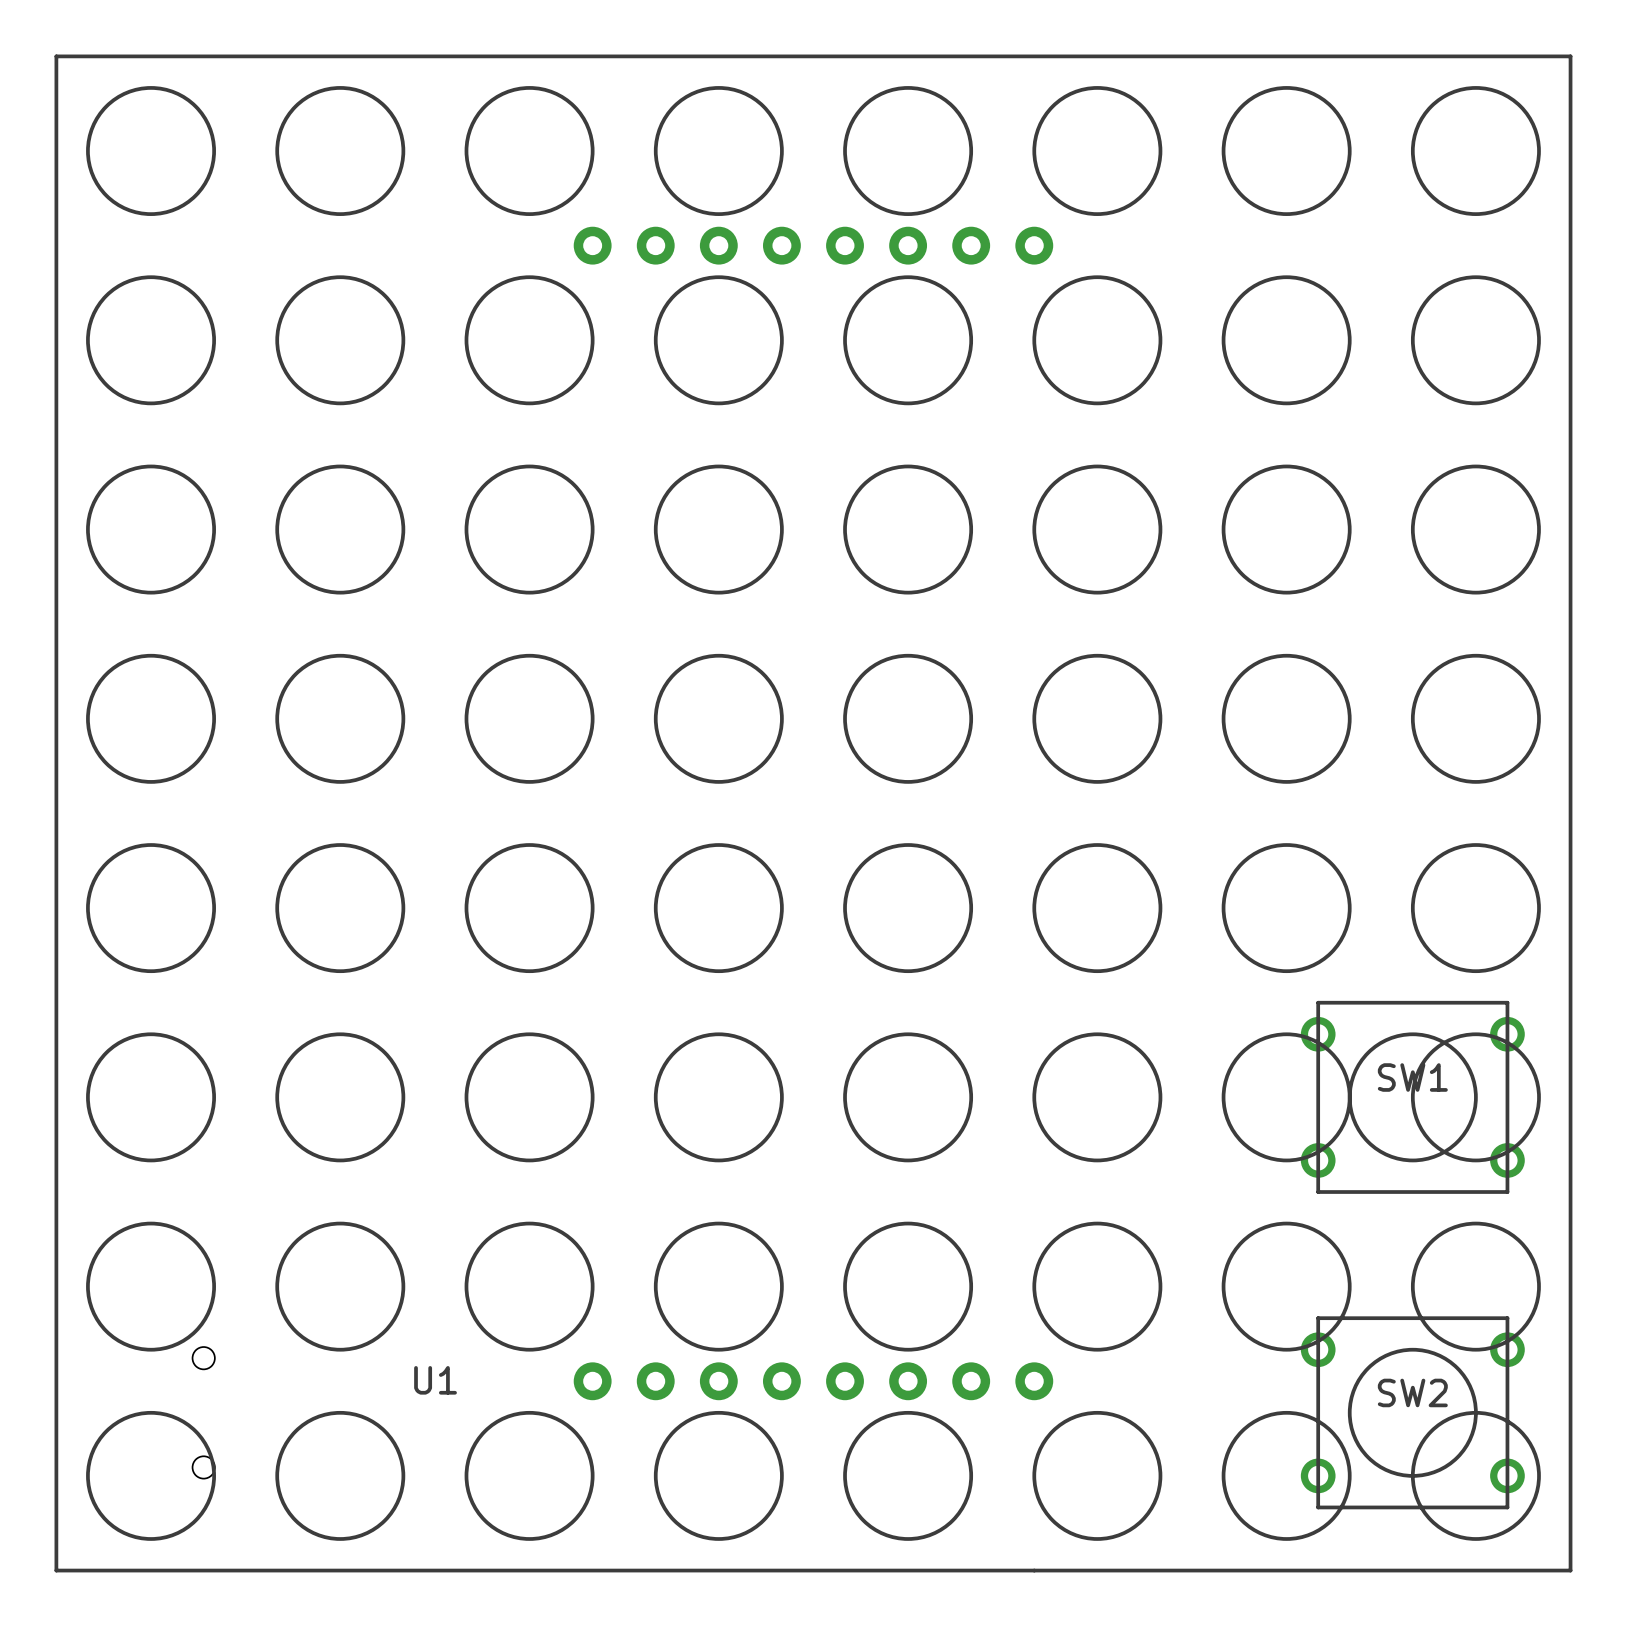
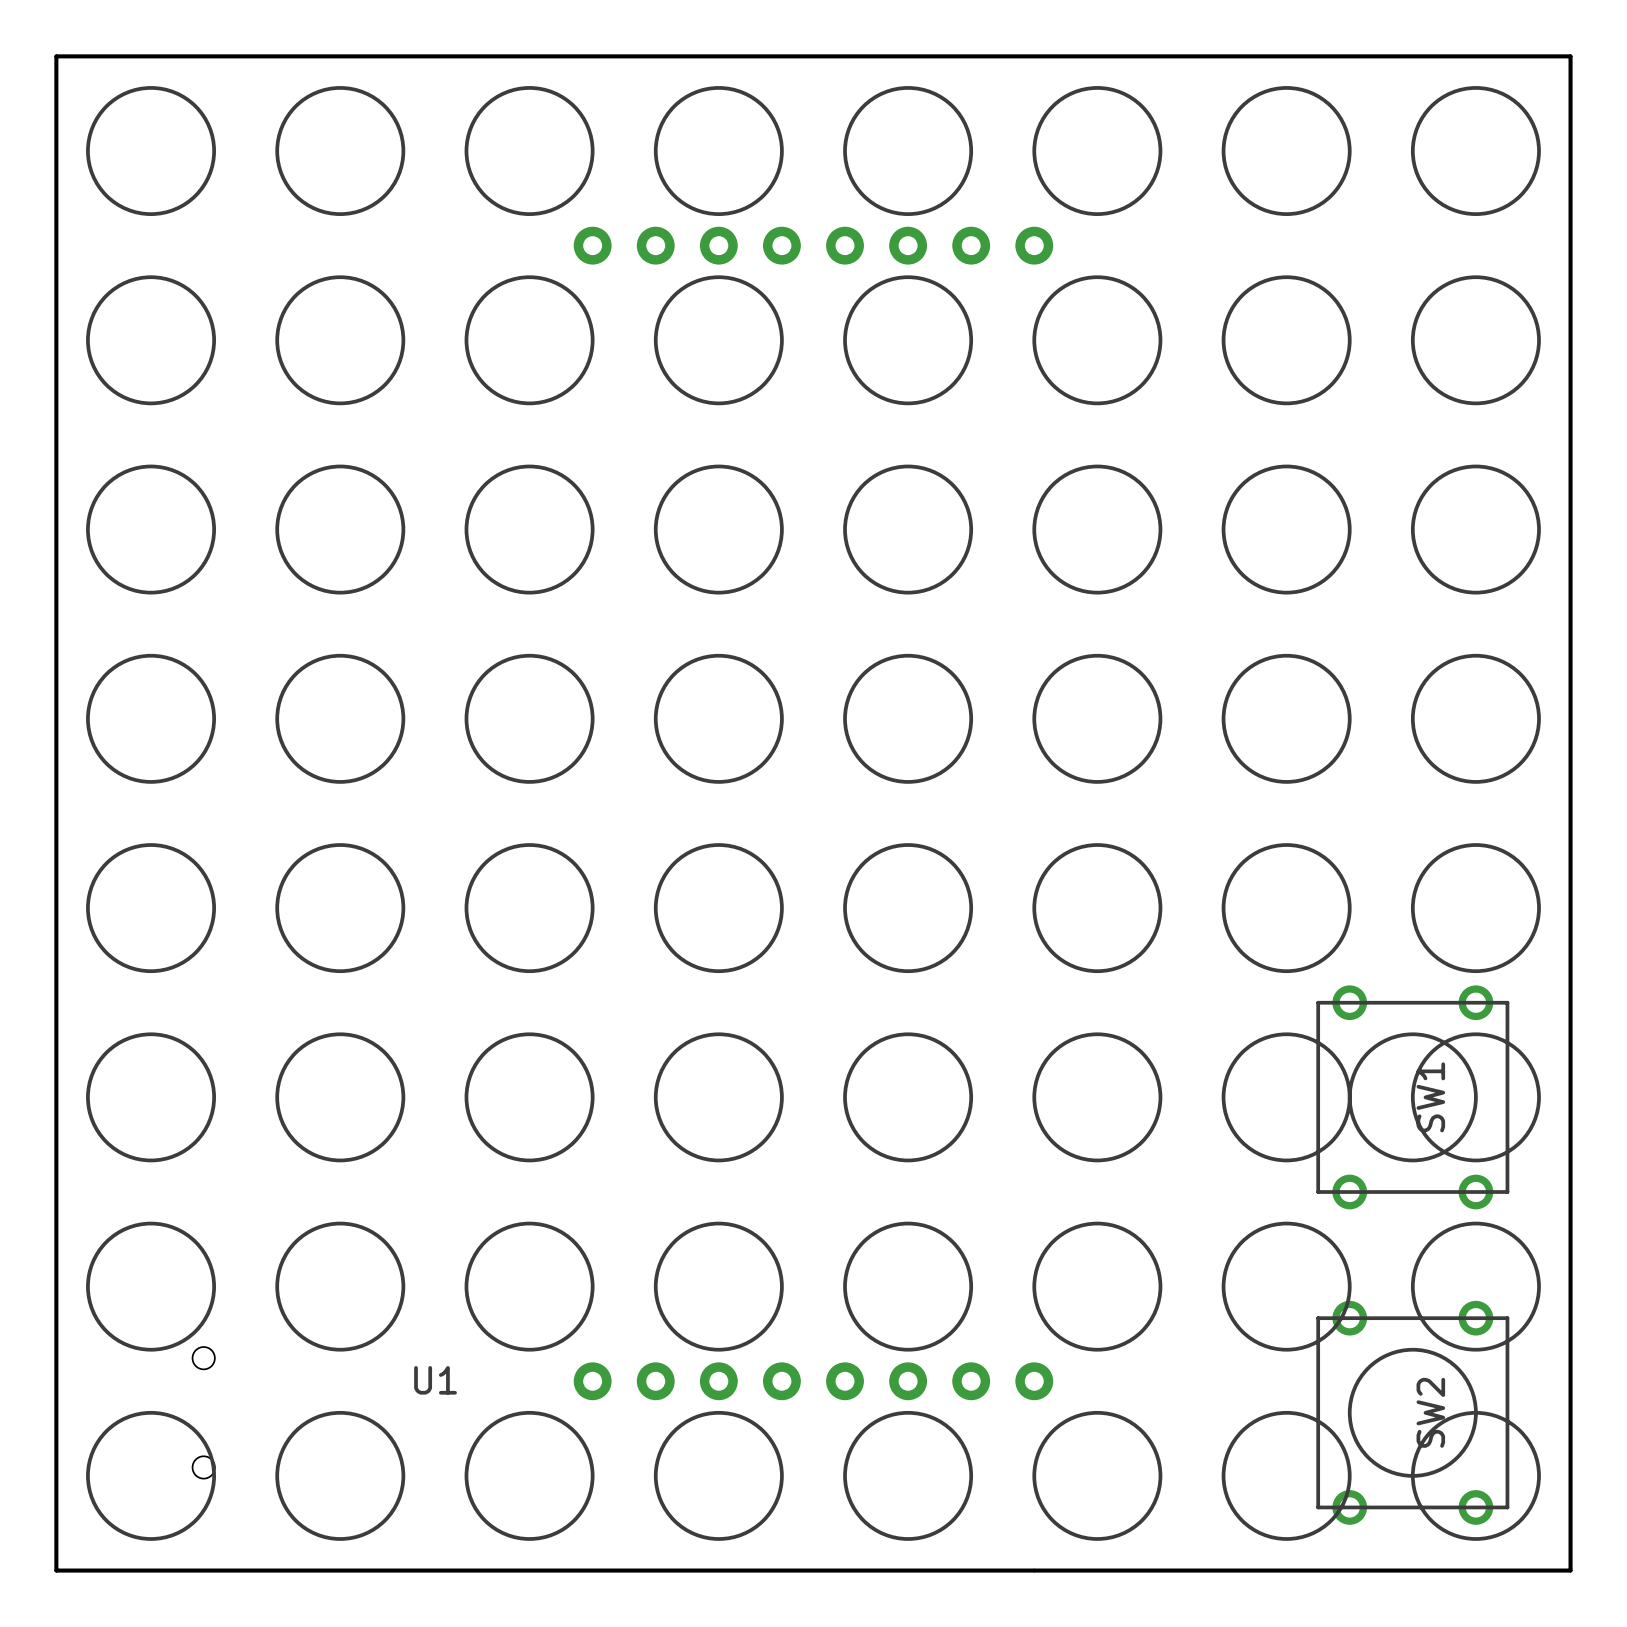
board edge: none -> (56, 56) (56, 1570) (1570, 1570) (1570, 56) (56, 56)
SW1 rotation: 0° (1412, 1097) -> 90° clockwise (1412, 1097)
SW2 rotation: 0° (1412, 1412) -> 90° clockwise (1412, 1412)

